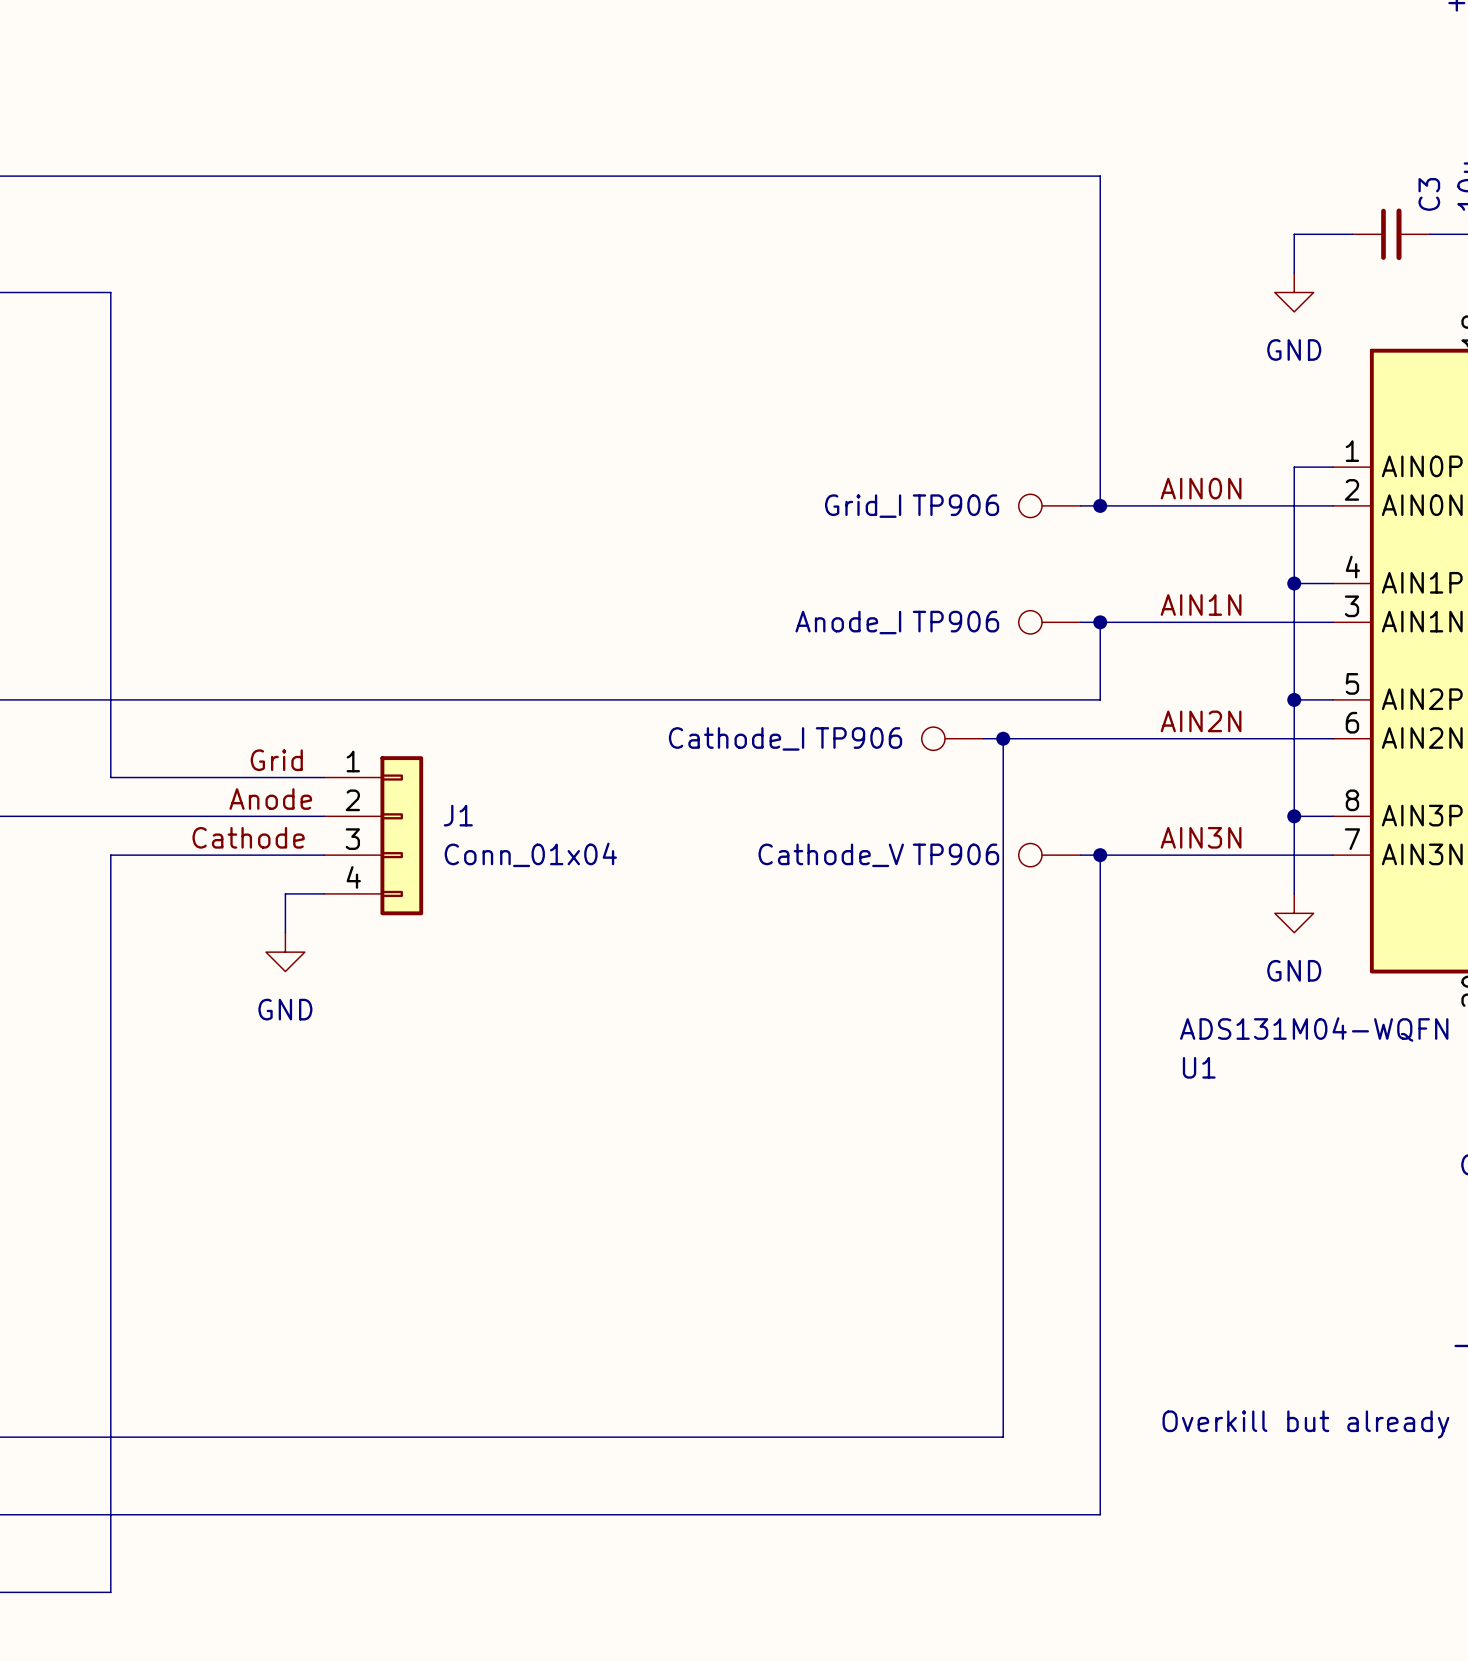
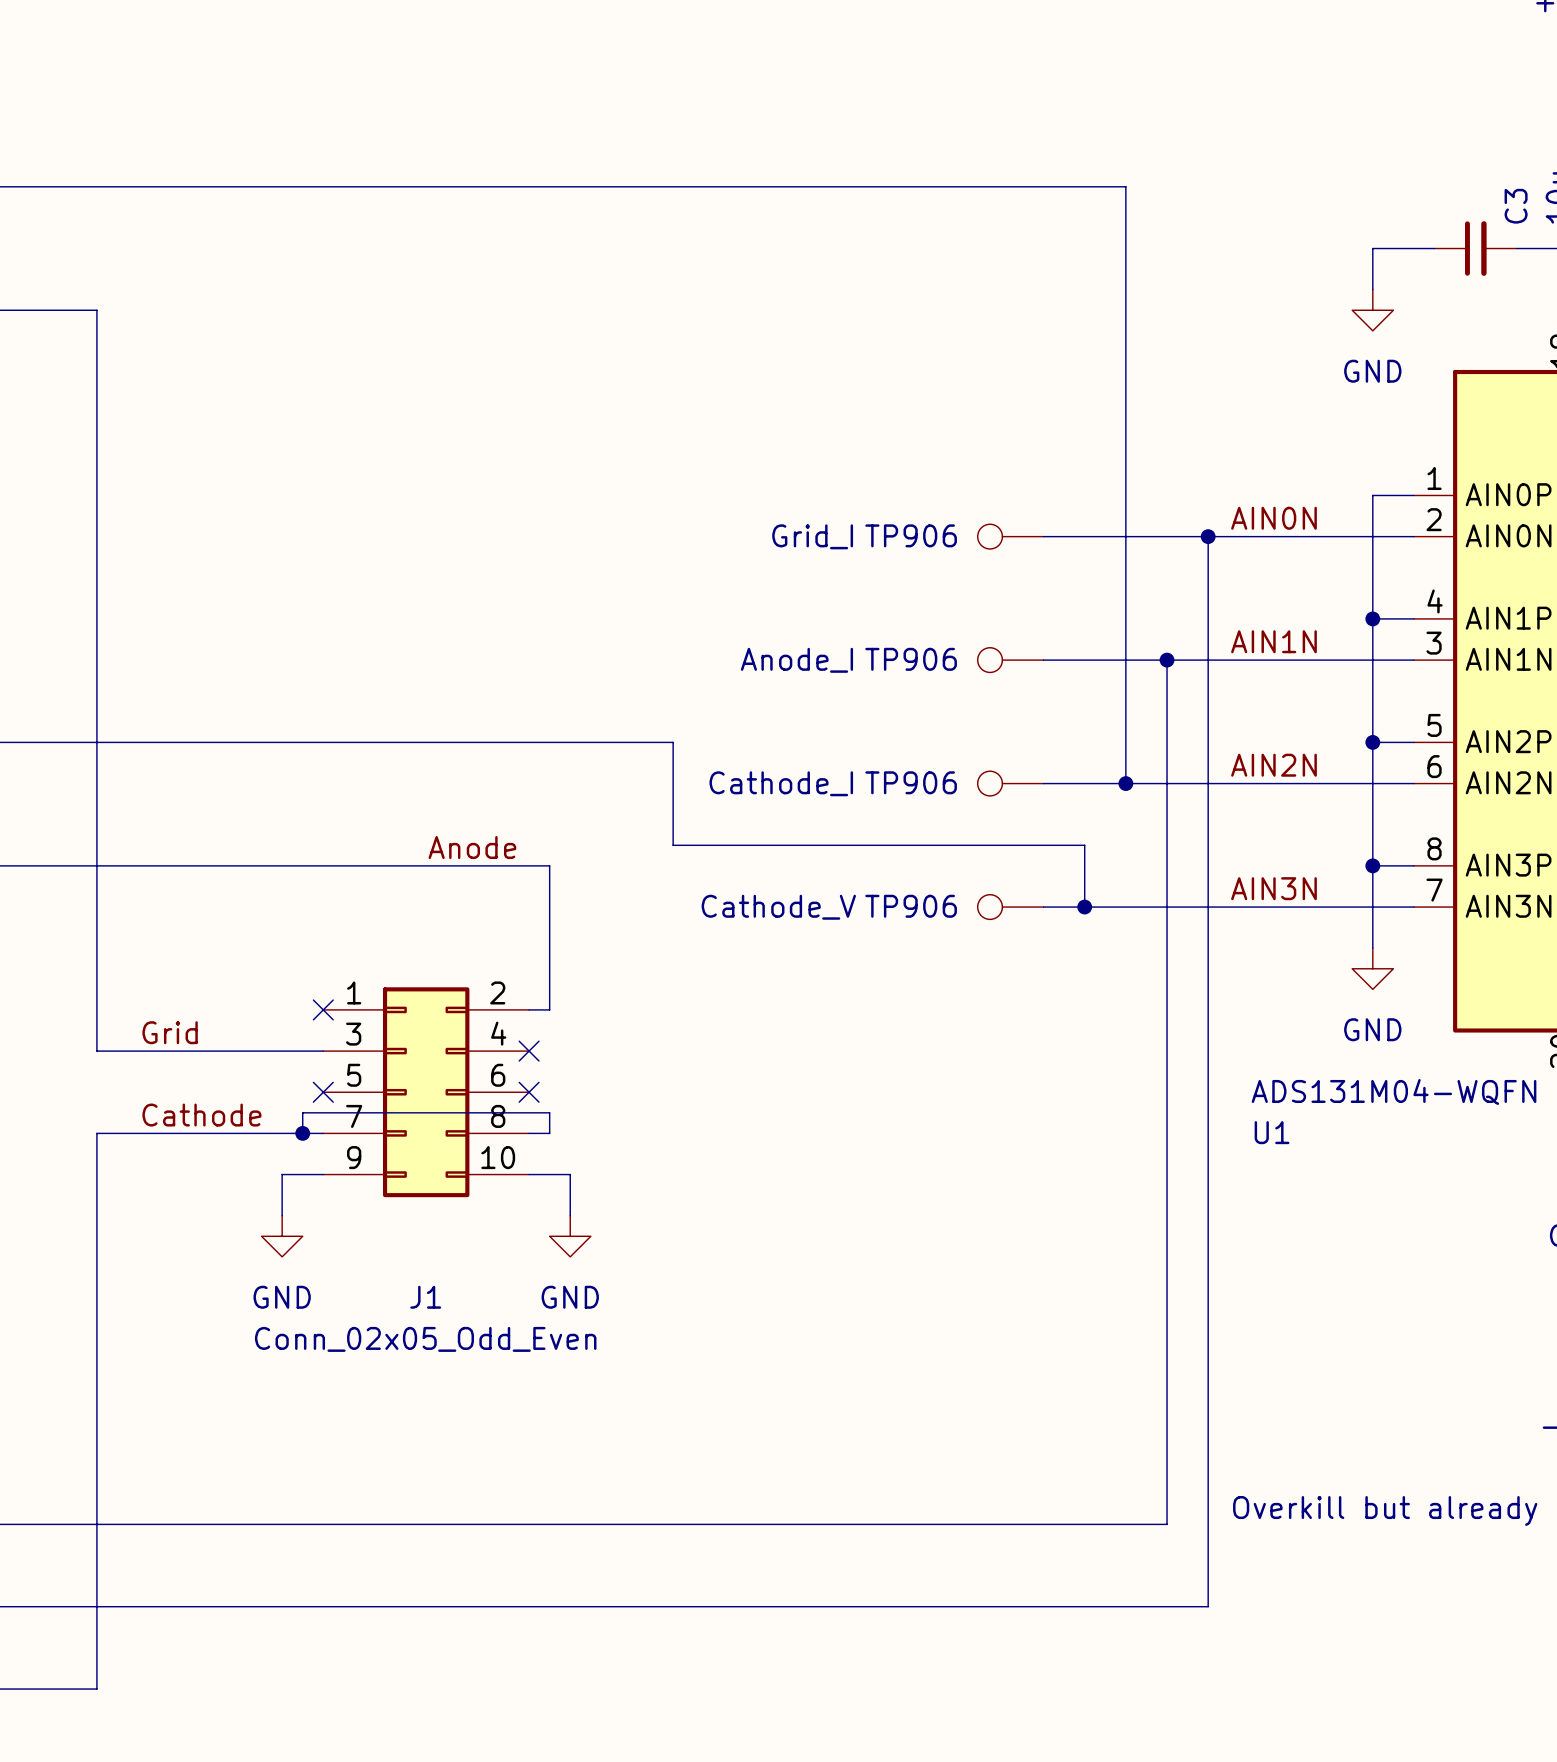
wire: (1061, 176) (1100, 176) (1100, 505) -> (1125, 186) (1125, 783)
wire: (91, 292) (110, 292) (110, 777) (324, 777) -> (96, 310) (96, 1051) (323, 1051)
wire: none -> (1043, 536) (1146, 536)
TP906 position: (1049, 505) -> (1010, 536)
junction position: (1100, 505) -> (1208, 536)
wire: none -> (1208, 536) (1208, 1606) (1167, 1606)
wire: none -> (1043, 660) (1146, 660)
TP906 position: (1049, 622) -> (1010, 660)
wire: (634, 699) (1100, 699) -> (673, 742) (673, 845) (1084, 845) (1084, 907)
wire: none -> (1167, 742) (1167, 907)
wire: (1003, 738) (1003, 1437) -> none
junction position: (1003, 738) -> (1125, 783)
J1 symbol: [324, 756, 424, 916] -> [323, 987, 530, 1198]
label position: Grid (276, 760) -> Grid (170, 1032)
label position: Anode (270, 799) -> Anode (472, 847)
J1 name position: J1 (458, 815) -> J1 (425, 1297)
wire: none -> (343, 865) (549, 865) (549, 1009) (529, 1009)
label position: Cathode (248, 837) -> Cathode (201, 1115)
J1 value: Conn_01x04 (530, 854) -> Conn_02x05_Odd_Even (425, 1339)
wire: (324, 855) (110, 855) (110, 1592) (91, 1592) -> (323, 1133) (96, 1133) (96, 1689)
wire: none -> (1043, 907) (1146, 907)
junction: none -> (1084, 907)
TP906 position: (1049, 855) -> (1010, 907)
junction: (1100, 855) -> none
wire: (324, 893) (285, 893) (285, 932) -> (323, 1174) (282, 1174) (282, 1215)
power symbol: GND (285, 952) -> none
no-connect mark: none -> (323, 1009)
no-connect mark: none -> (529, 1051)
no-connect mark: none -> (323, 1092)
no-connect mark: none -> (529, 1092)
wire: none -> (302, 1133) (302, 1112) (549, 1112) (549, 1133) (529, 1133)
junction: none -> (302, 1133)
wire: none -> (529, 1174) (570, 1174) (570, 1215)
power symbol: none -> GND (282, 1236)
power symbol: none -> GND (570, 1236)
wire: (1100, 1437) (1100, 1514) -> (1167, 1524) (1064, 1524)

